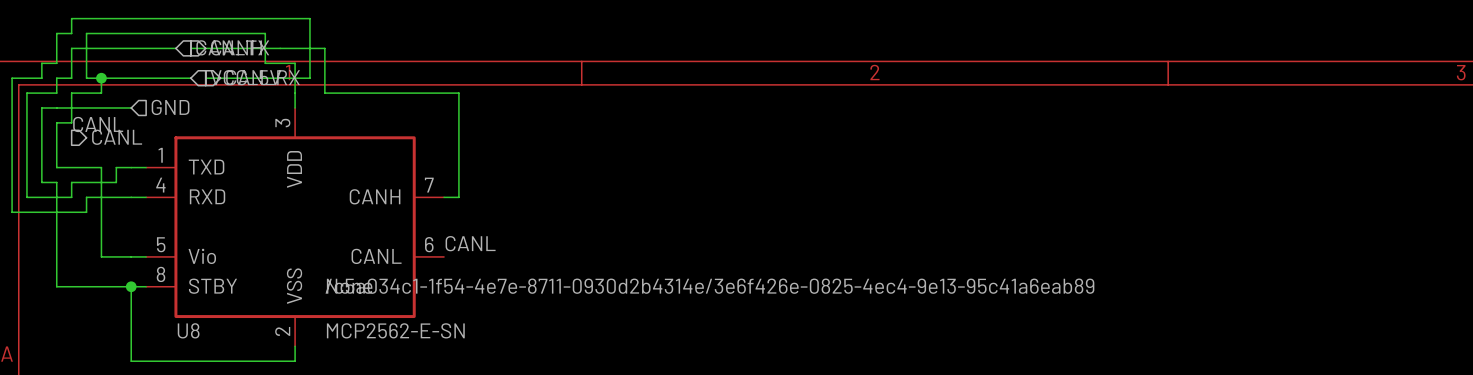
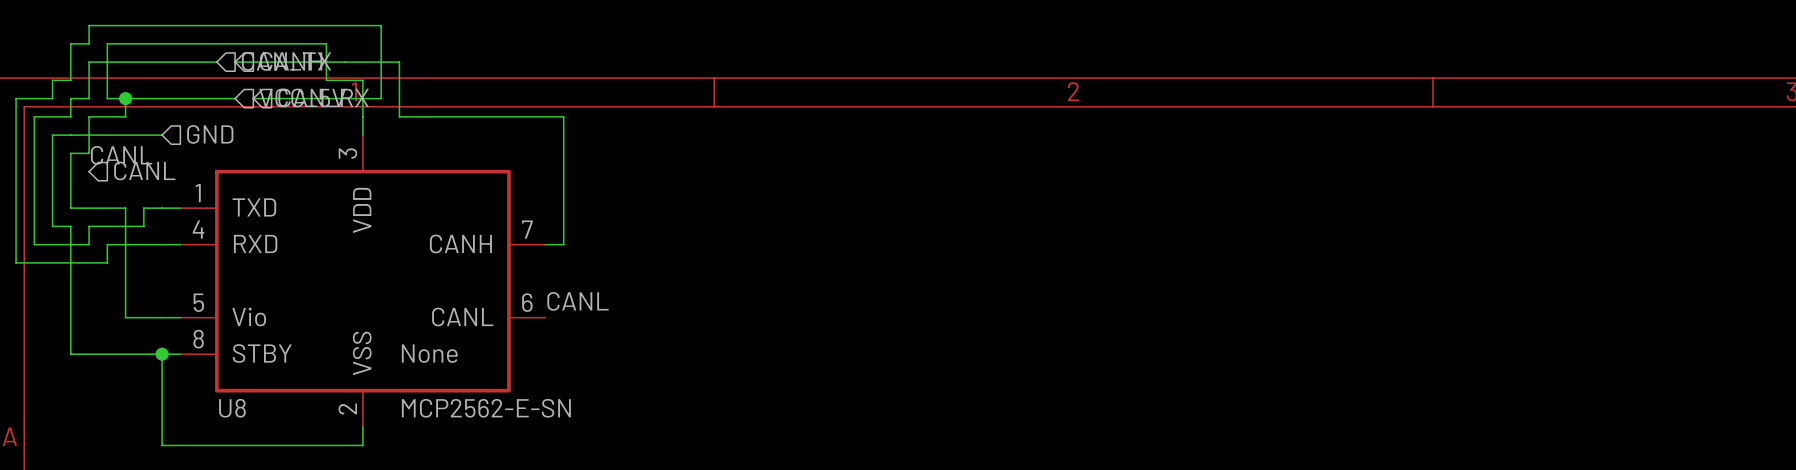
hierarchical label shape: output (236, 47) -> input (291, 61)
hierarchical label shape: output (263, 77) -> input (323, 97)
hierarchical label shape: output (117, 137) -> input (144, 170)
U8 text: /c5a034c1-1f54-4e7e-8711-0930d2b4314e/3e6f426e-0825-4ec4-9e13-95c41a6eab89 (709, 286) -> none

